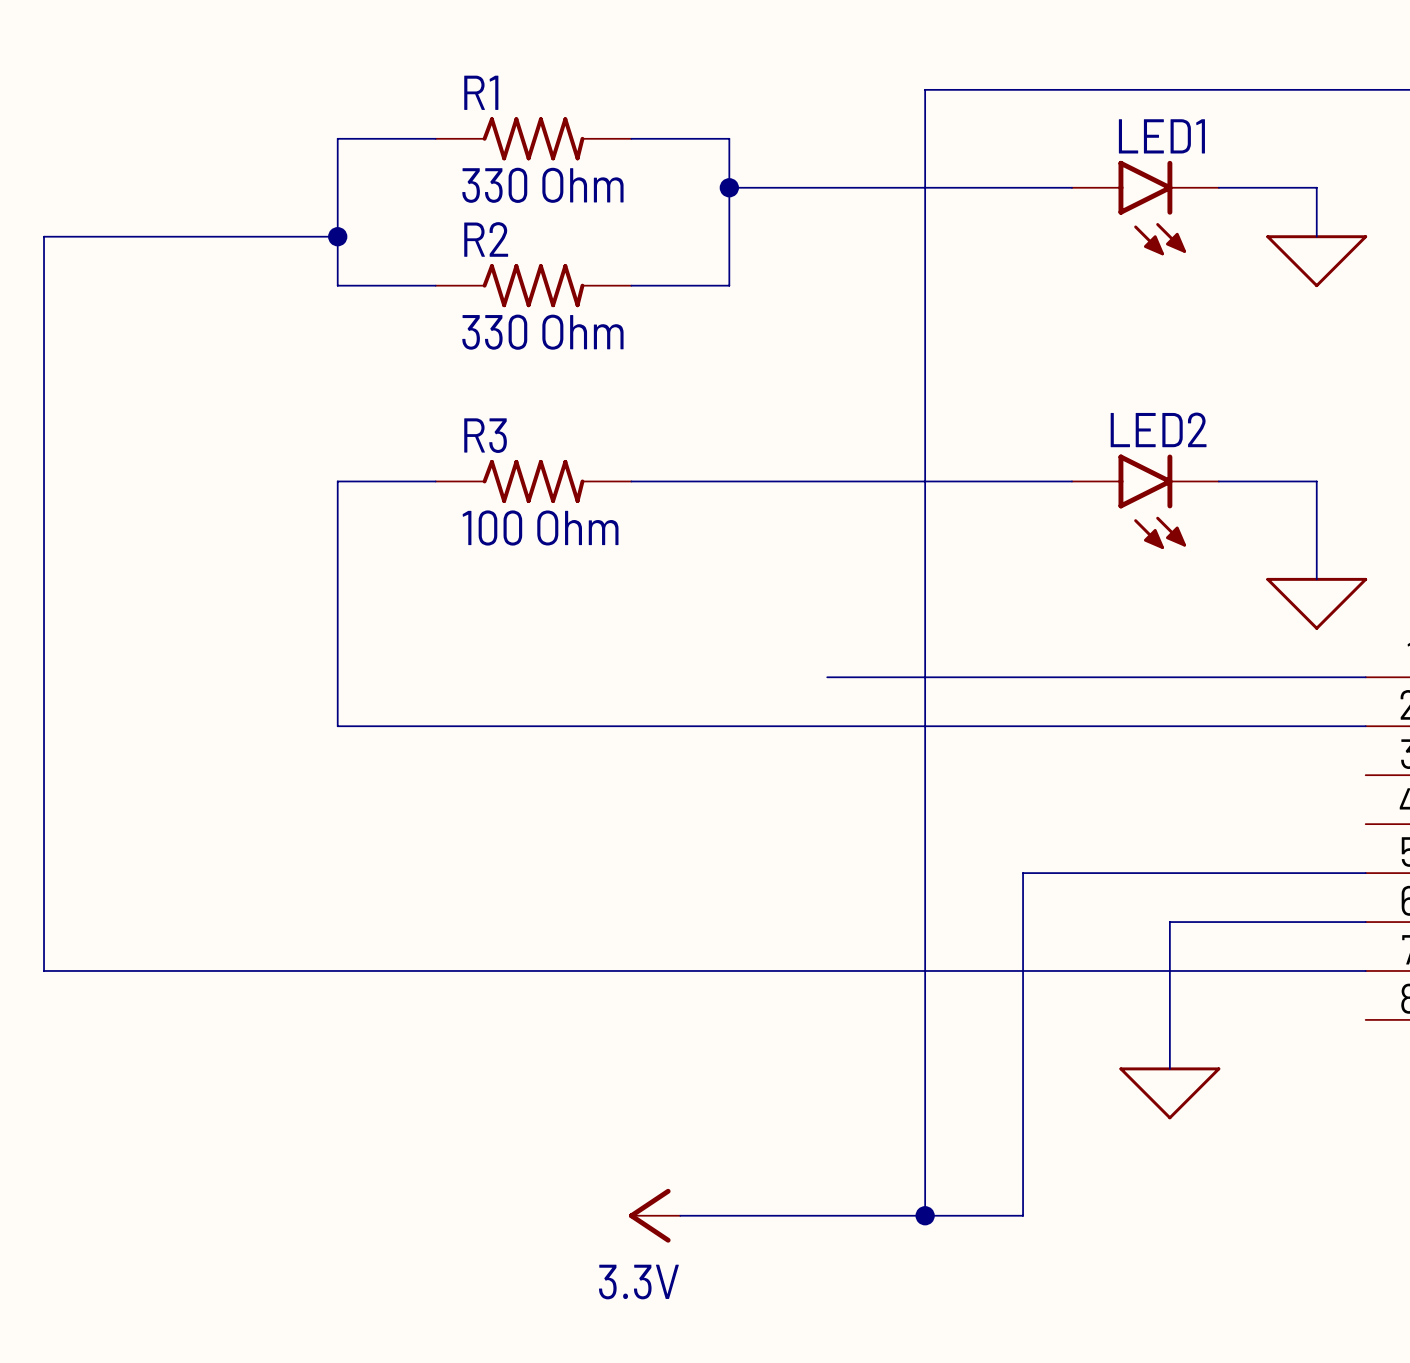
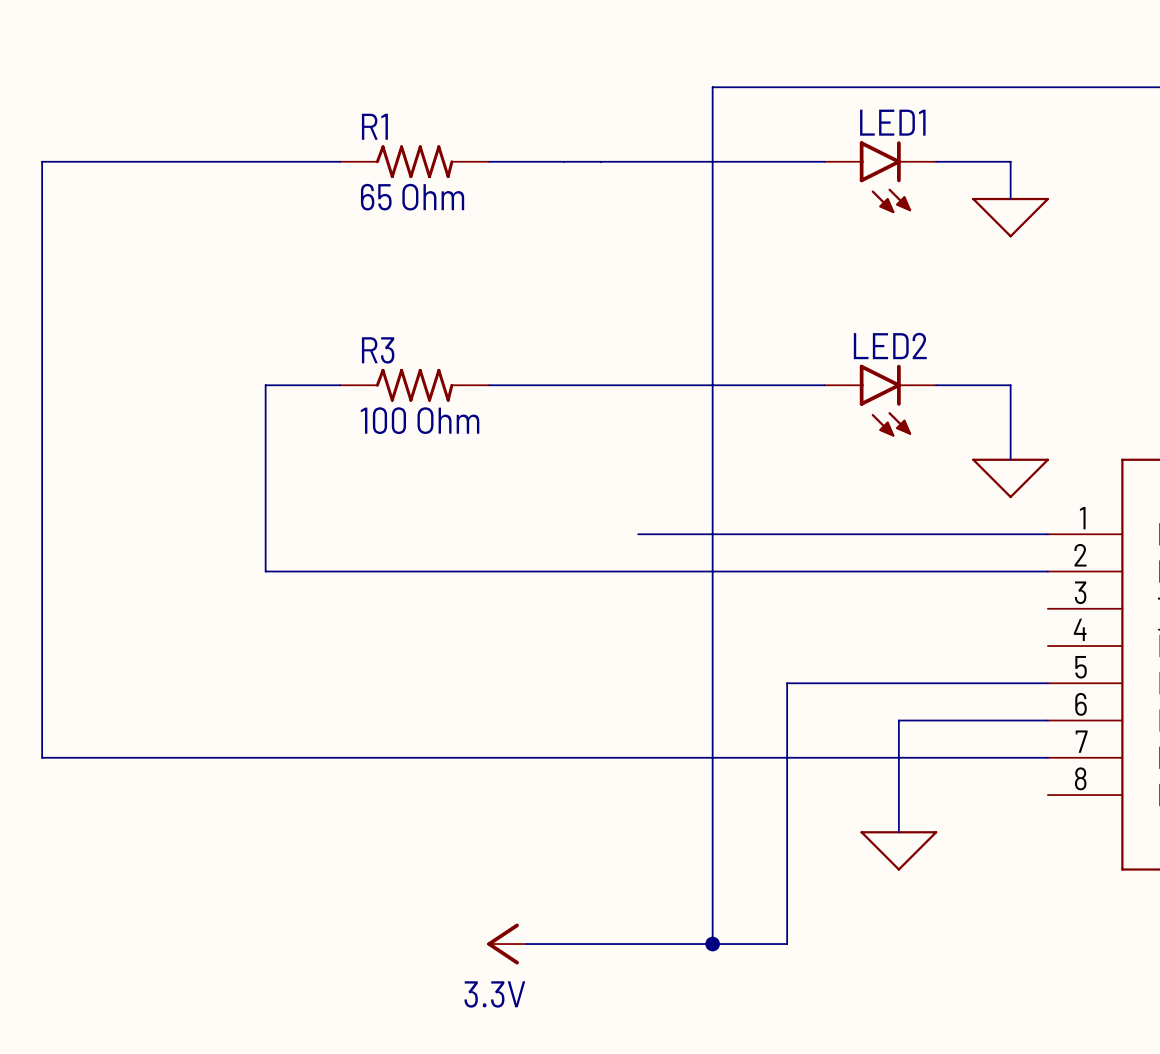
wire: (435, 138) (337, 138) (337, 285) (435, 285) -> none
R1 position: (533, 138) -> (414, 161)
wire: (631, 138) (729, 138) (729, 285) (631, 285) -> none
R1 value: 330 Ohm (542, 185) -> 65 Ohm (412, 197)
wire: none -> (489, 161) (563, 161)
junction: (729, 187) -> none
wire: (44, 236) (337, 236) -> (42, 199) (42, 161) (340, 161)
junction: (337, 236) -> none
R2: 330 Ohm (533, 285) -> none

